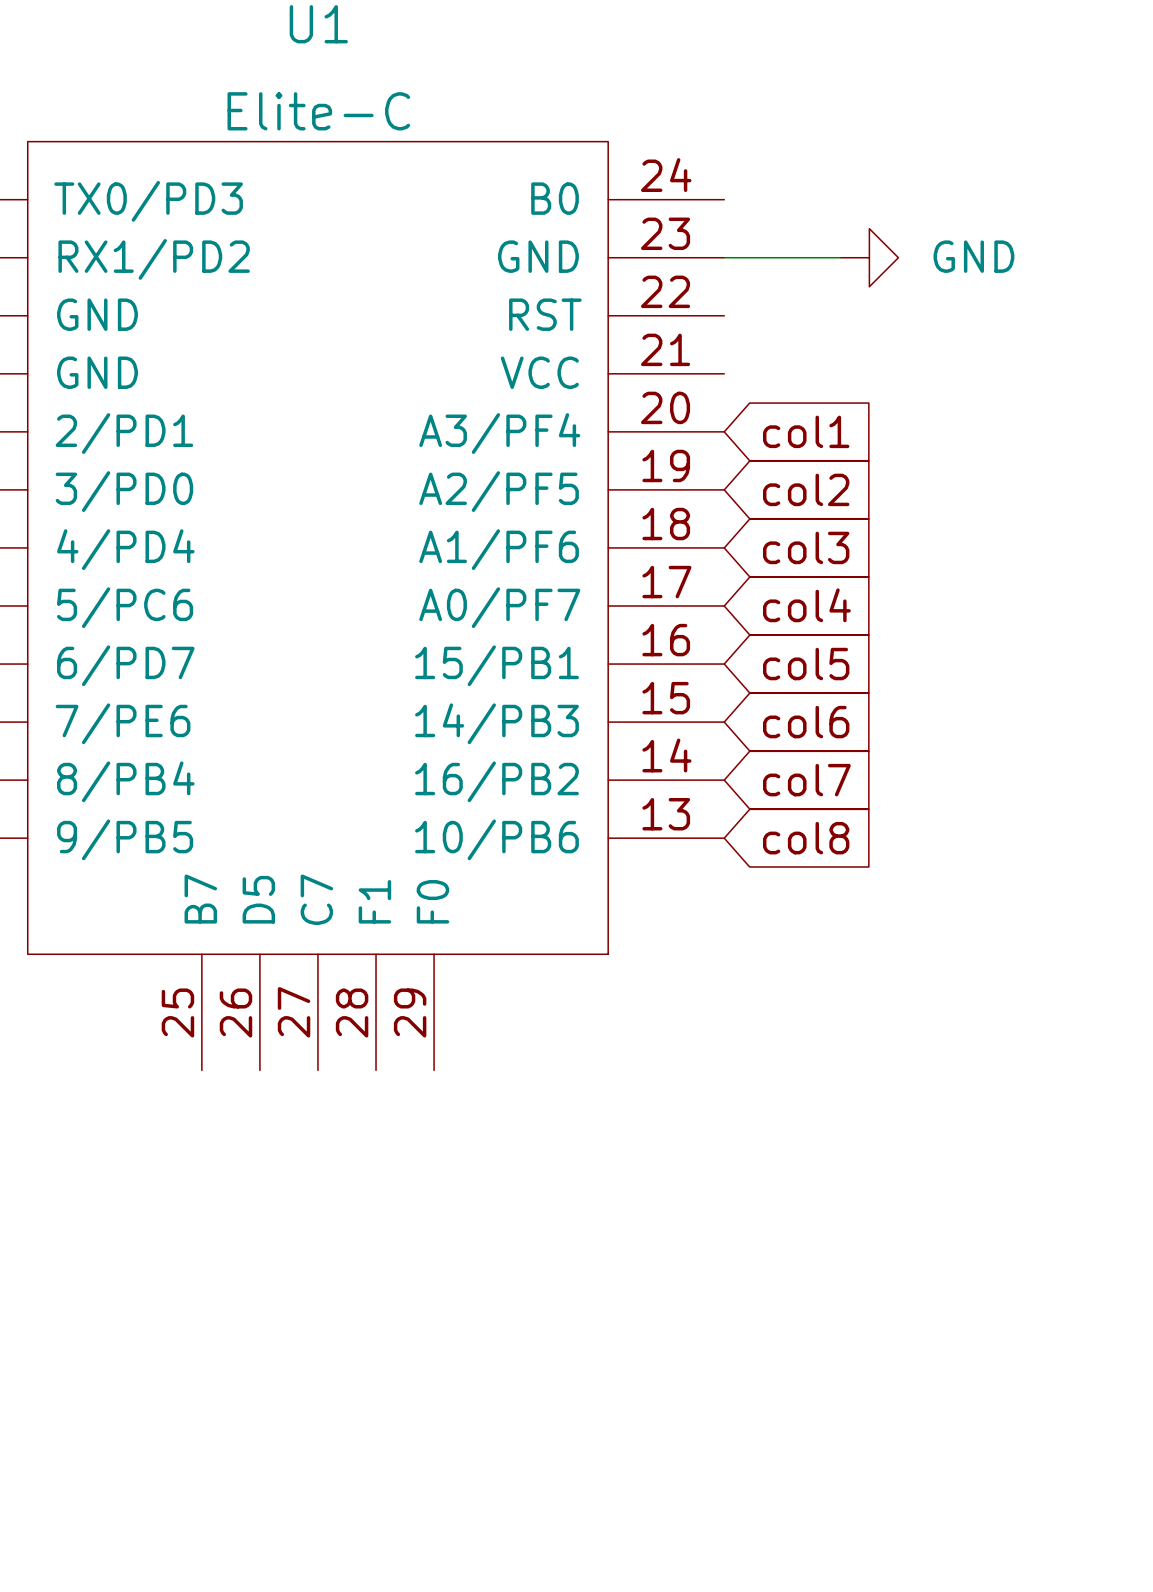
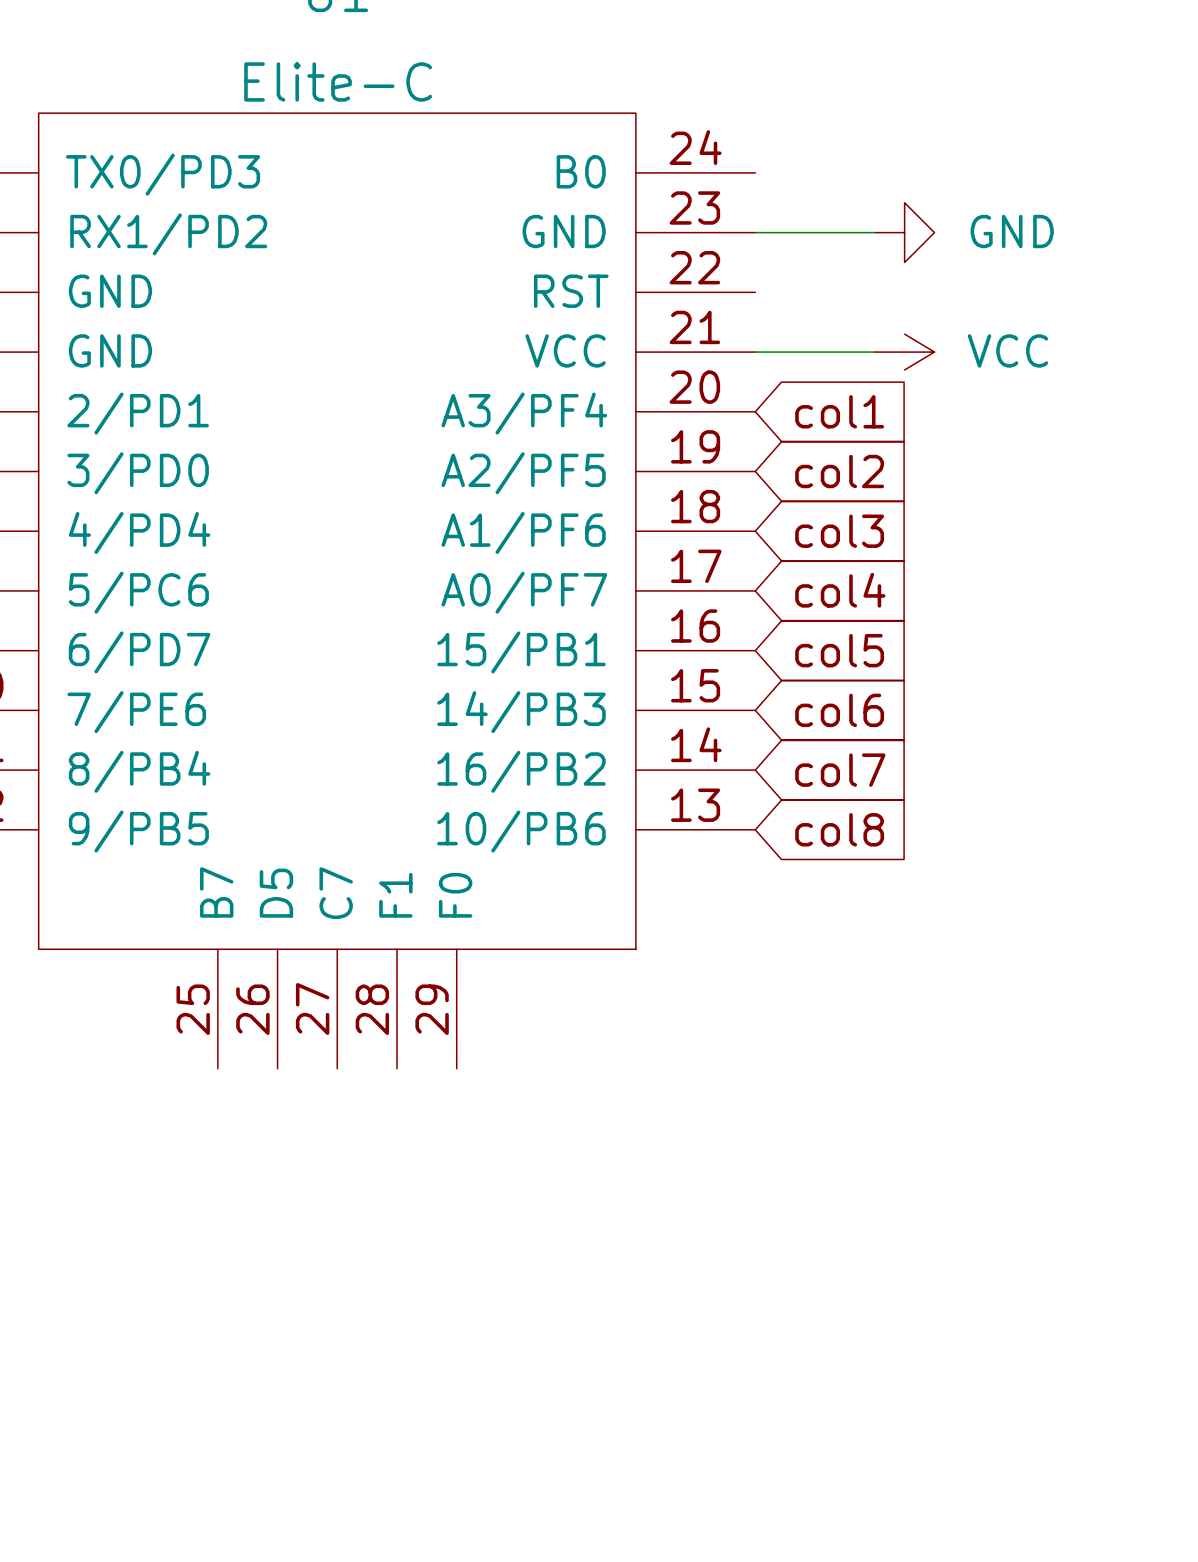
wire: none -> (755, 352) (874, 352)
power symbol: none -> VCC (904, 352)

